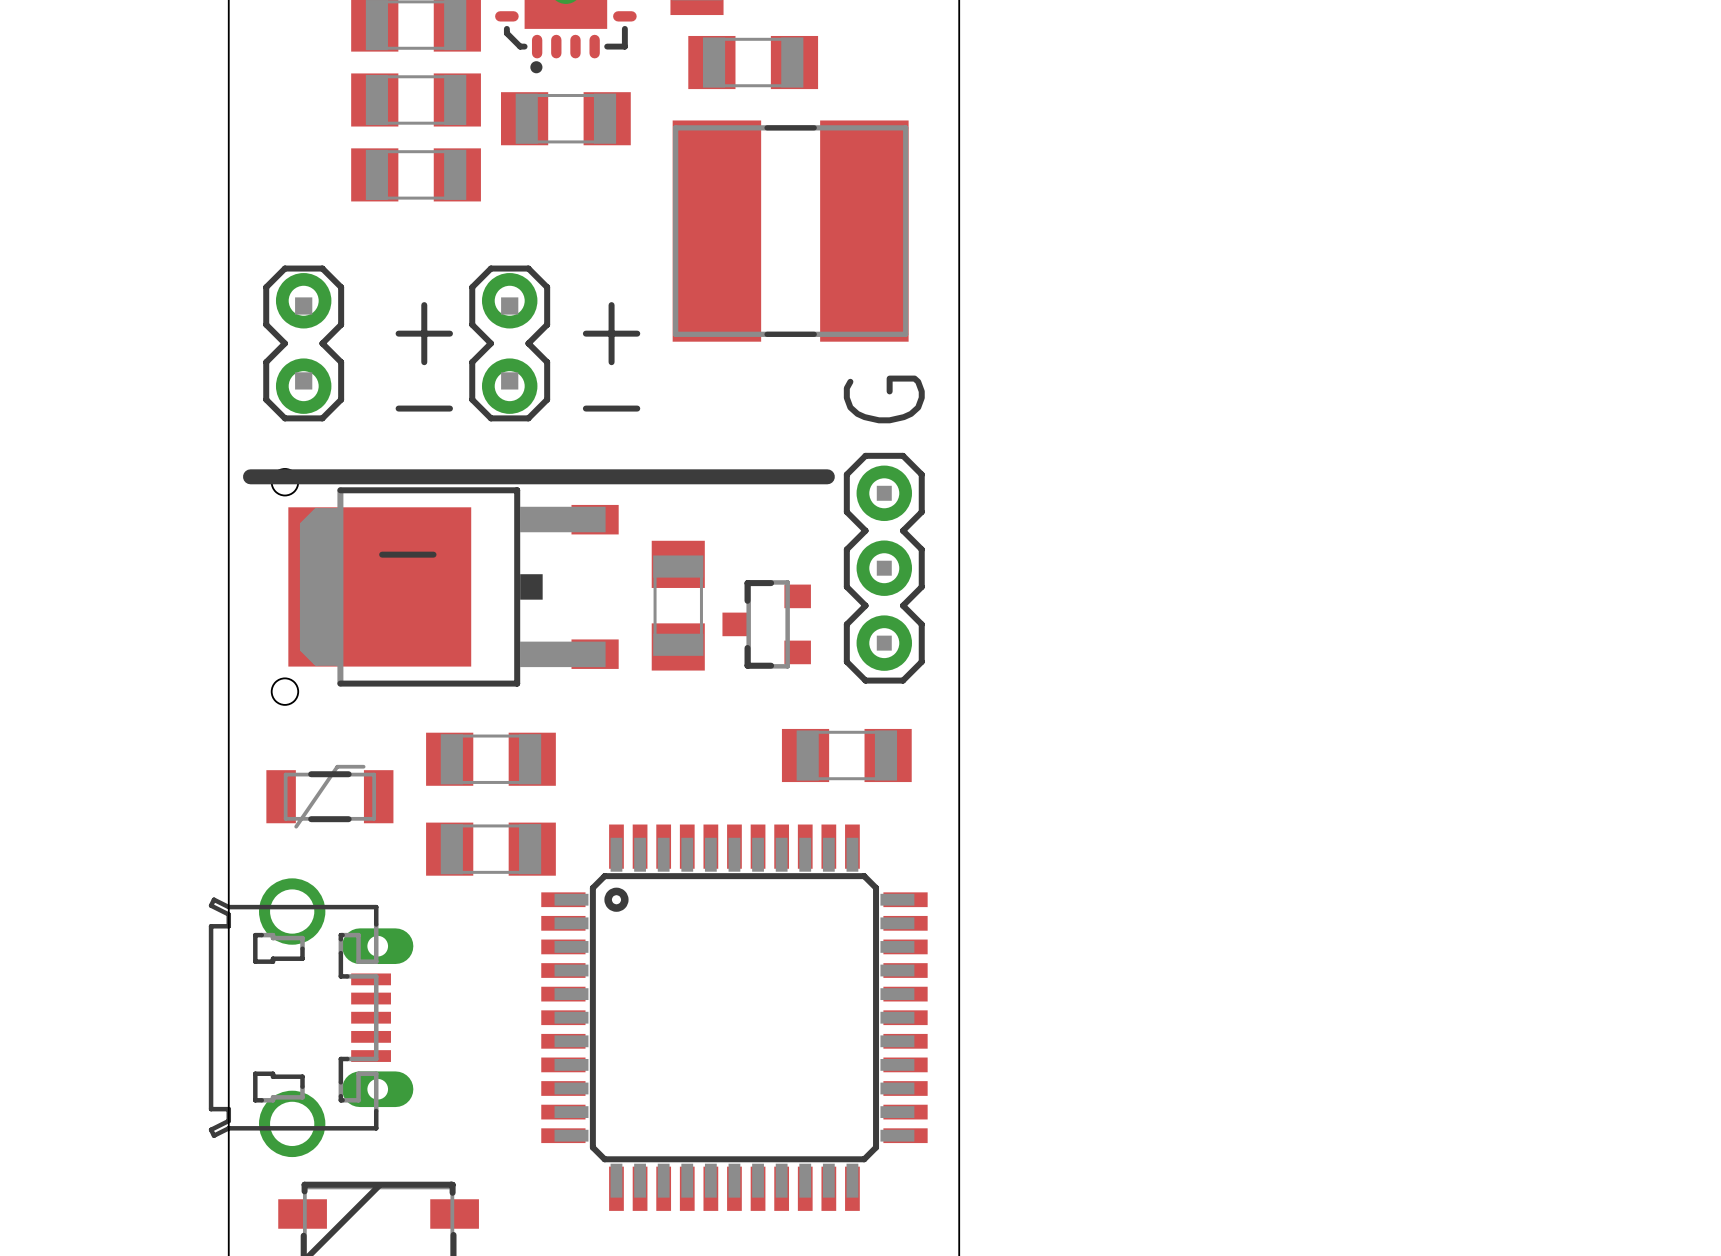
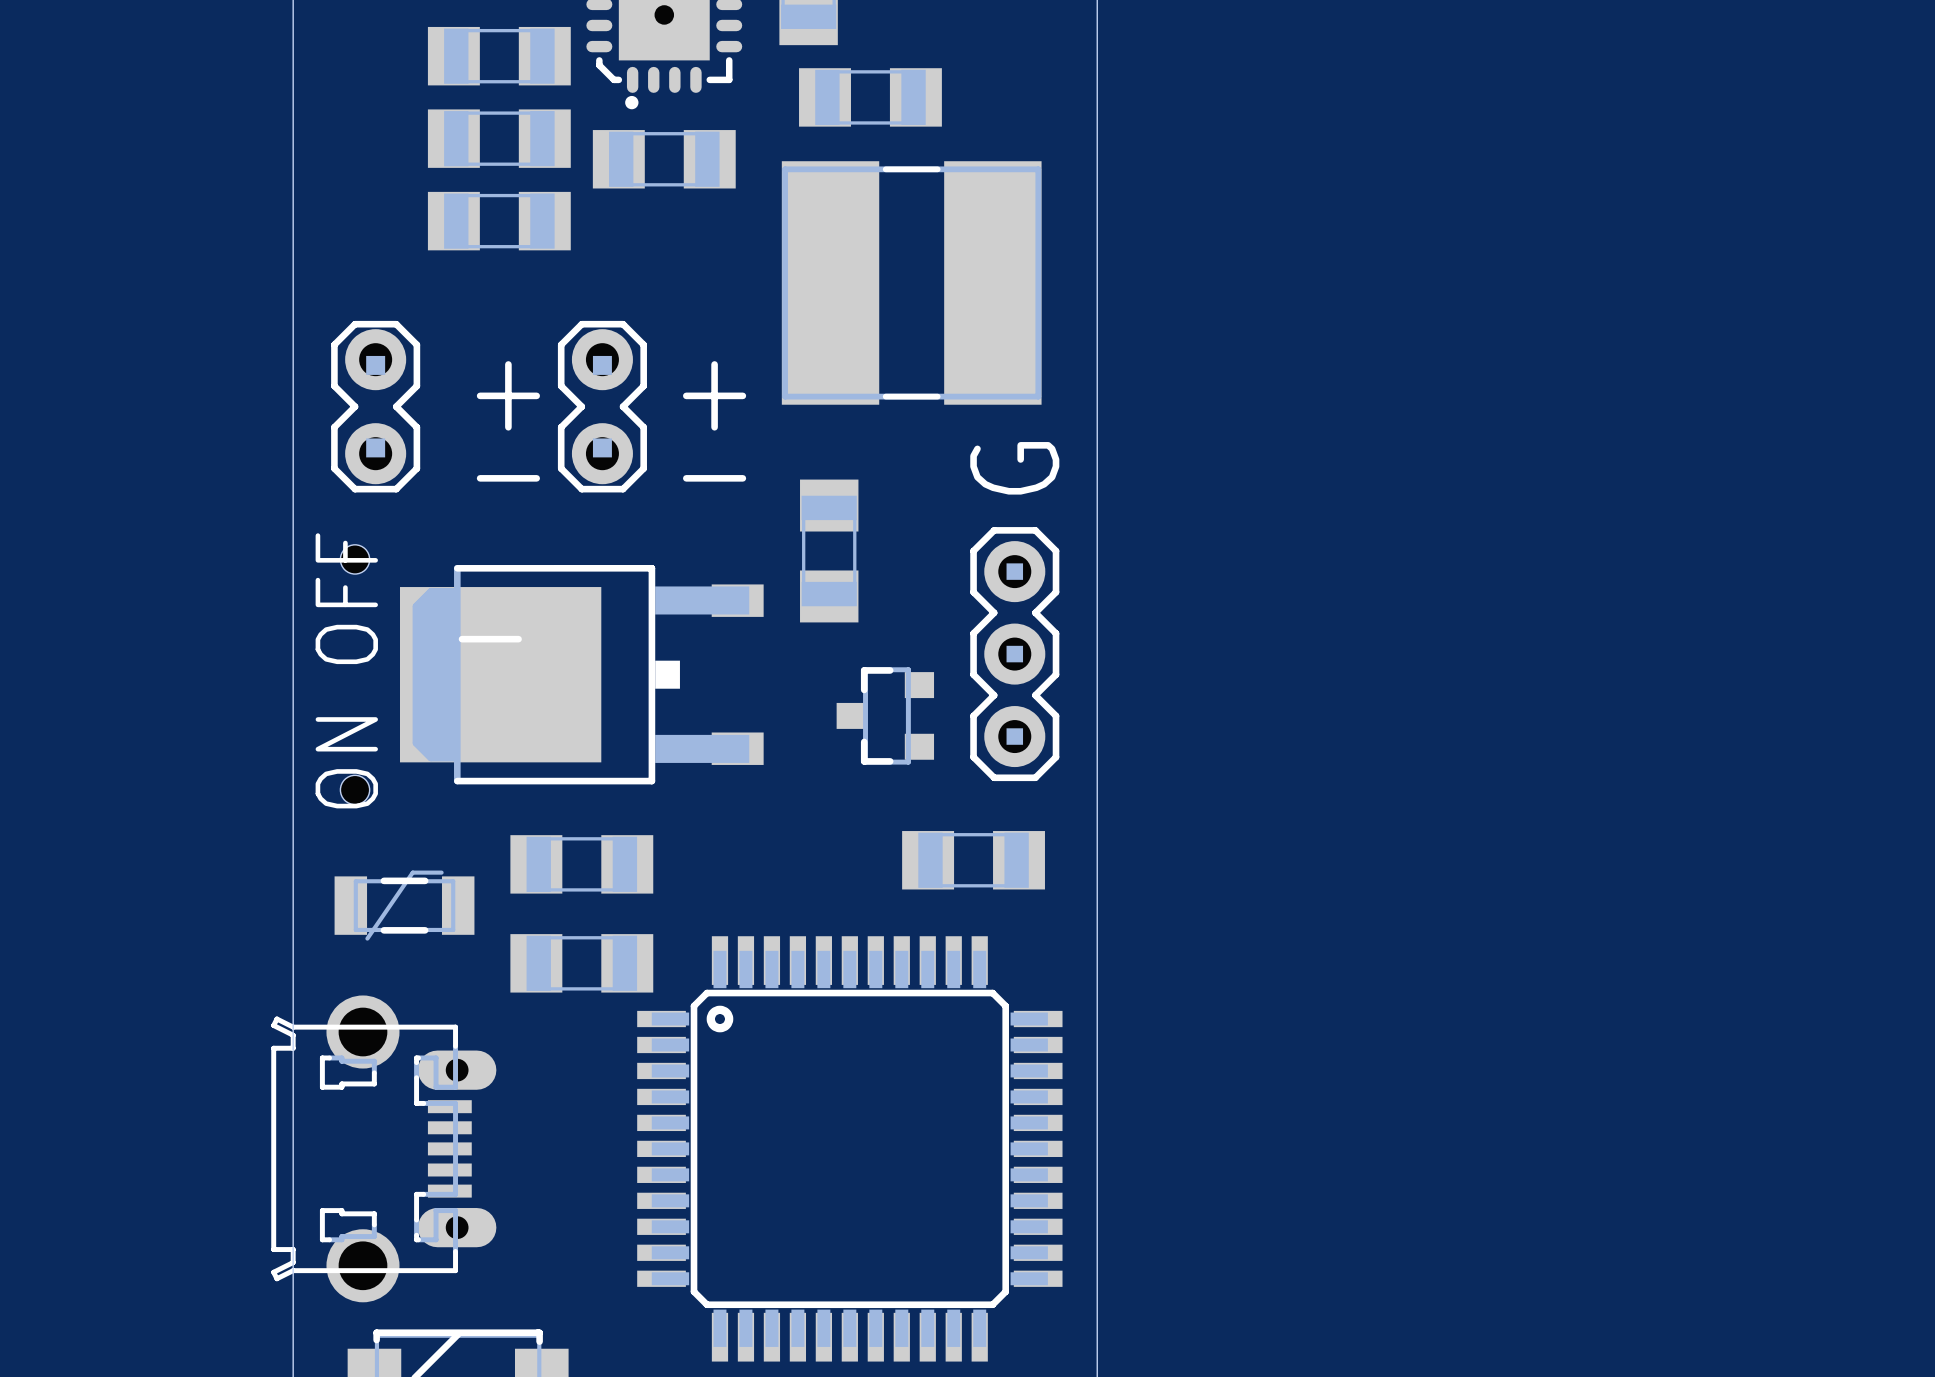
line: (250, 476) (827, 476) -> none
text: none -> OFF (346, 598)
part position: (453, 586) -> (581, 674)
part position: (678, 605) -> (829, 550)
text: none -> ON (346, 762)

